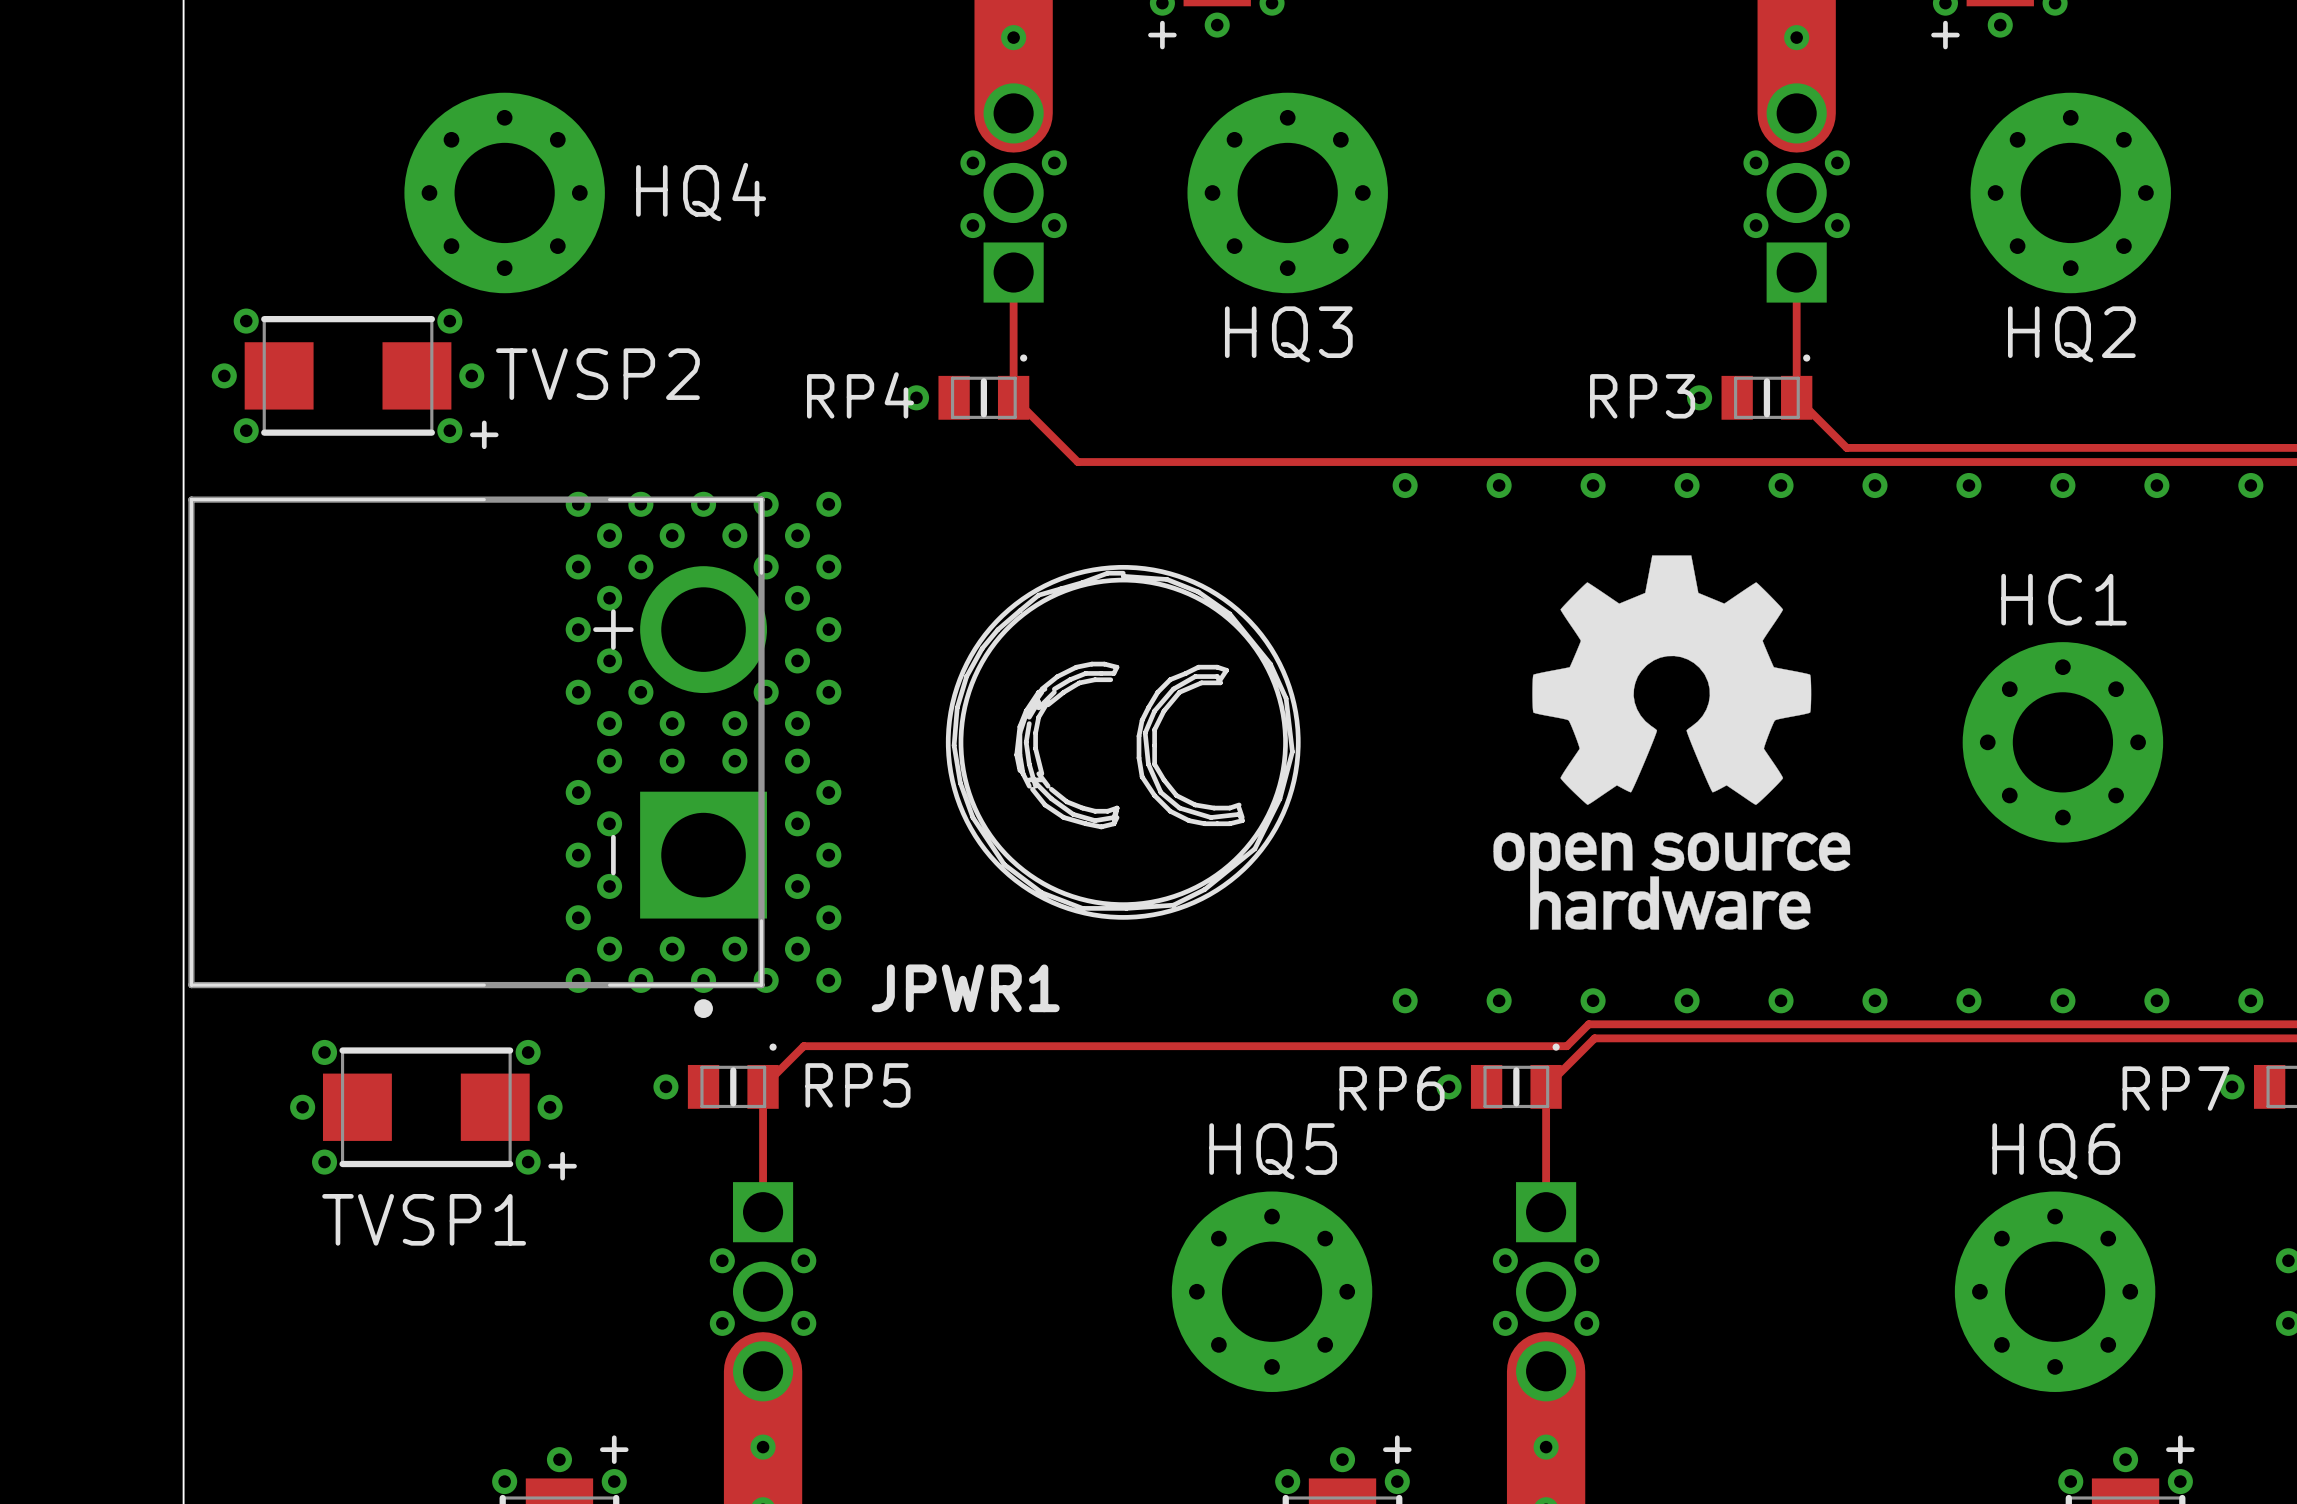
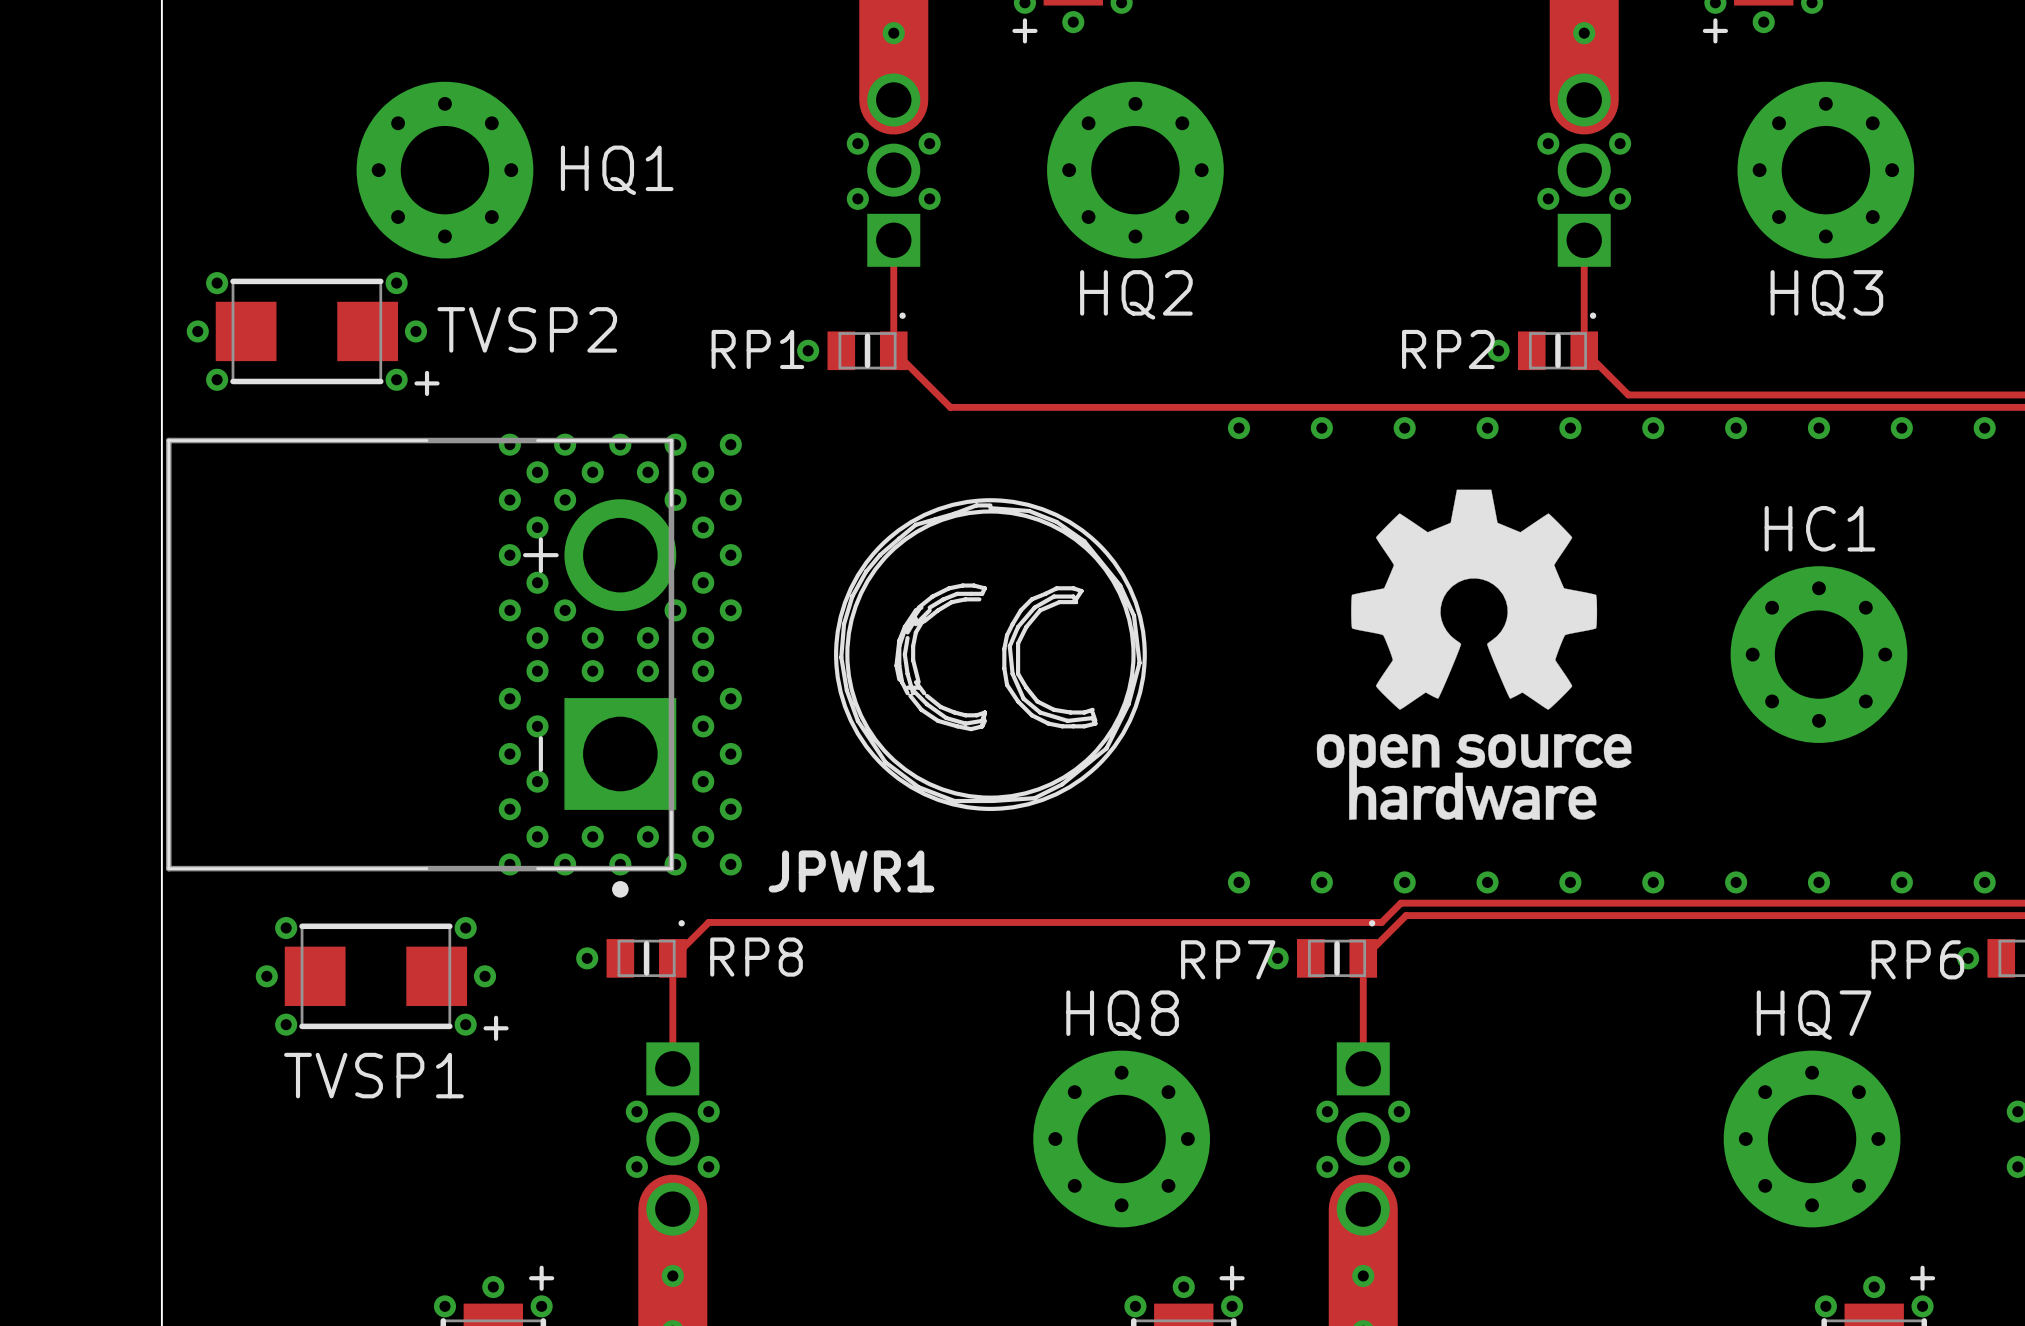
HQ4 name: HQ4 (701, 192) -> HQ1 (617, 170)
HQ3 name: HQ3 (1288, 334) -> HQ2 (1136, 294)
HQ2 name: HQ2 (2071, 334) -> HQ3 (1826, 294)
RP4 name: RP4 (860, 395) -> RP1 (757, 349)
RP3 name: RP3 (1642, 396) -> RP2 (1448, 349)
RP5 name: RP5 (857, 1085) -> RP8 (756, 957)
RP6 name: RP6 (1392, 1088) -> RP7 (1228, 959)
RP7 name: RP7 (2176, 1088) -> RP6 (1917, 959)
HQ5 name: HQ5 (1273, 1151) -> HQ8 (1122, 1015)
HQ6 name: HQ6 (2056, 1151) -> HQ7 (1814, 1015)

